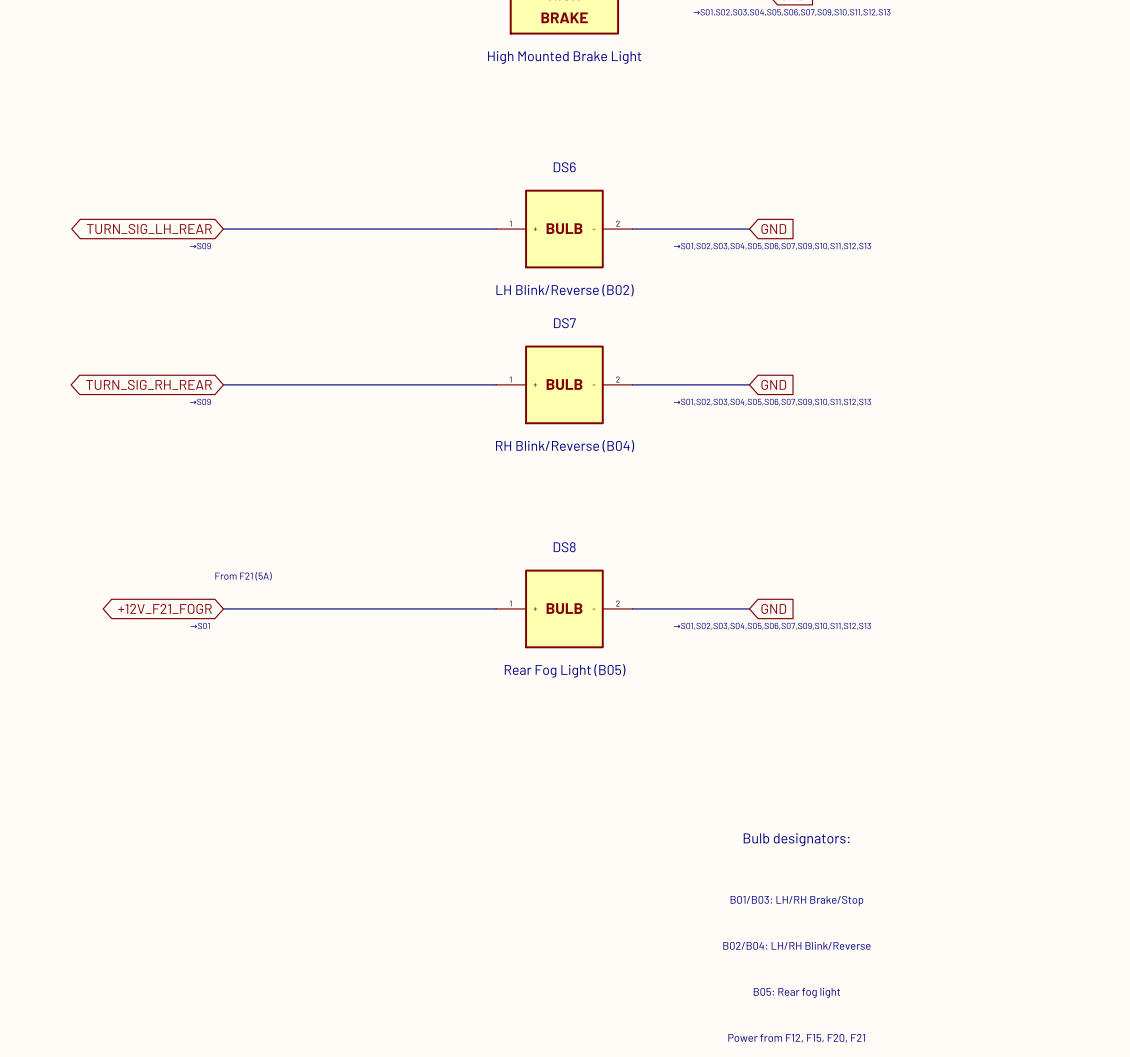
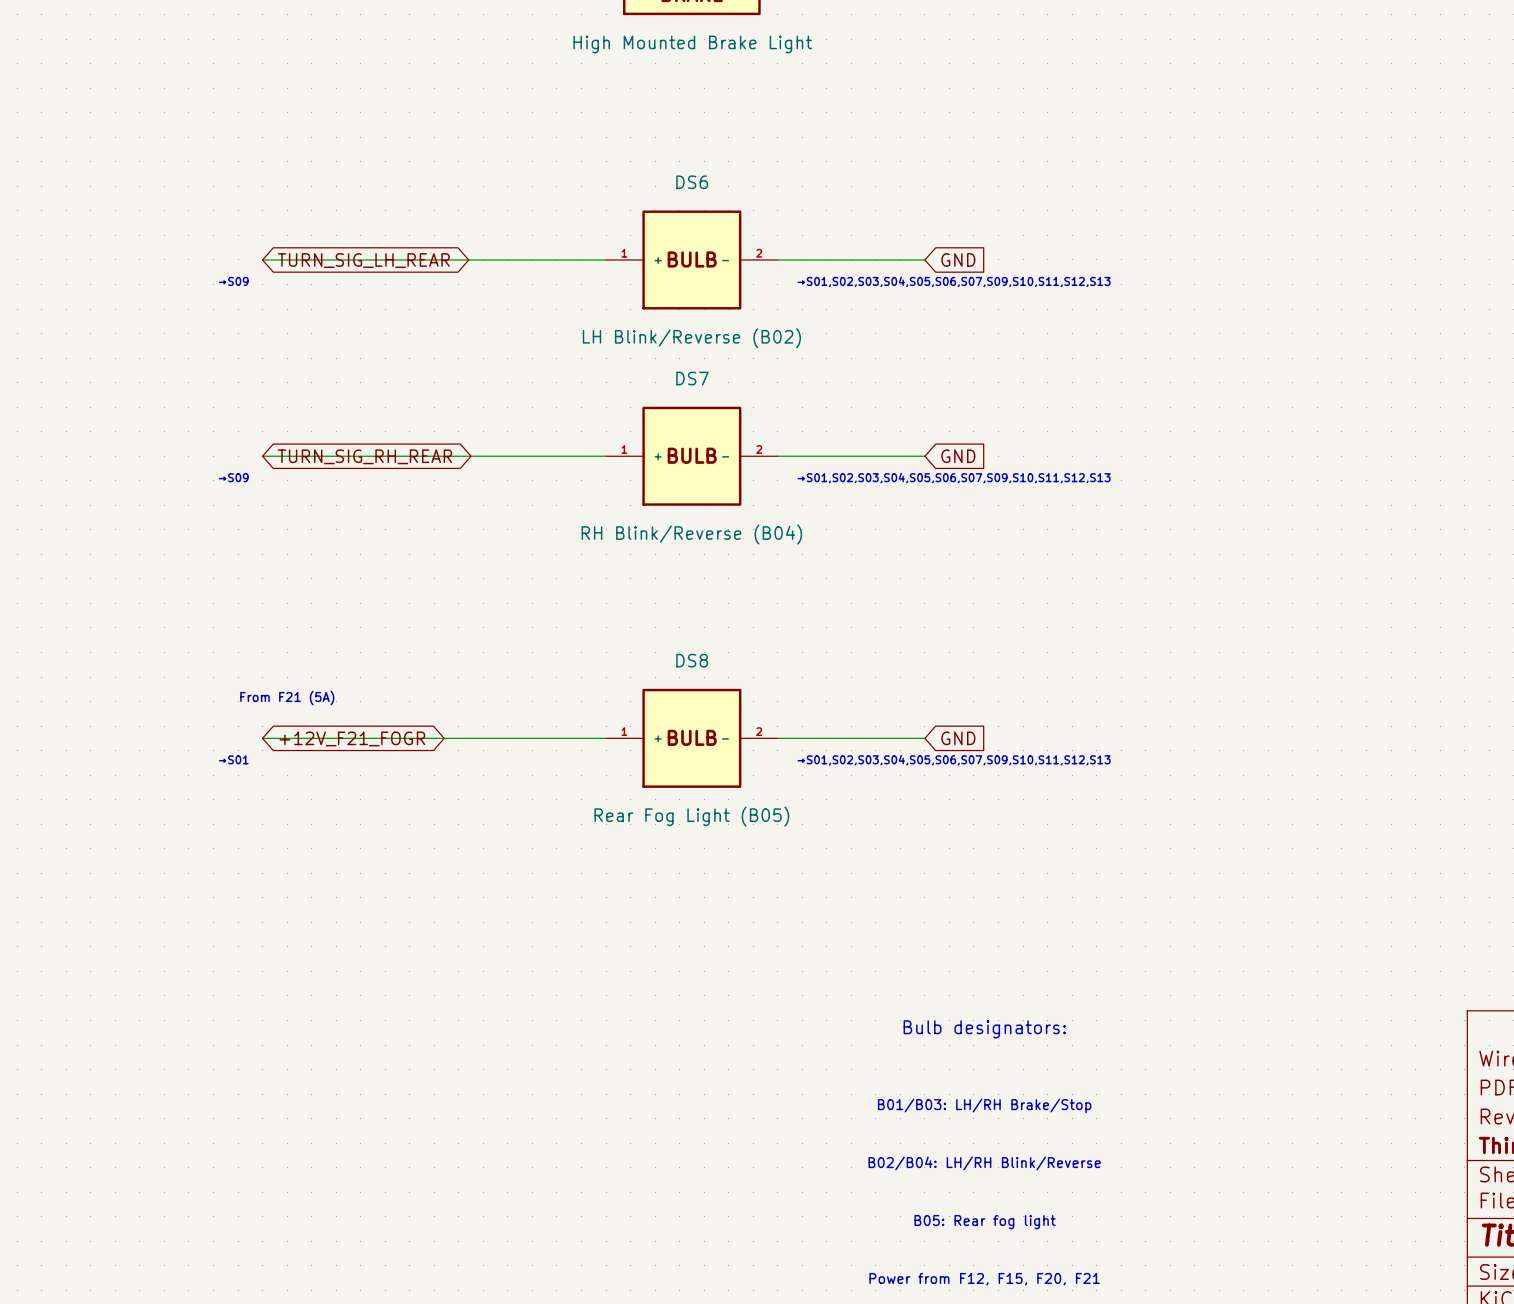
global label rotation: 0° (149, 229) -> 180° (363, 260)
global label rotation: 0° (149, 384) -> 180° (364, 456)
global label rotation: 0° (165, 608) -> 180° (352, 738)

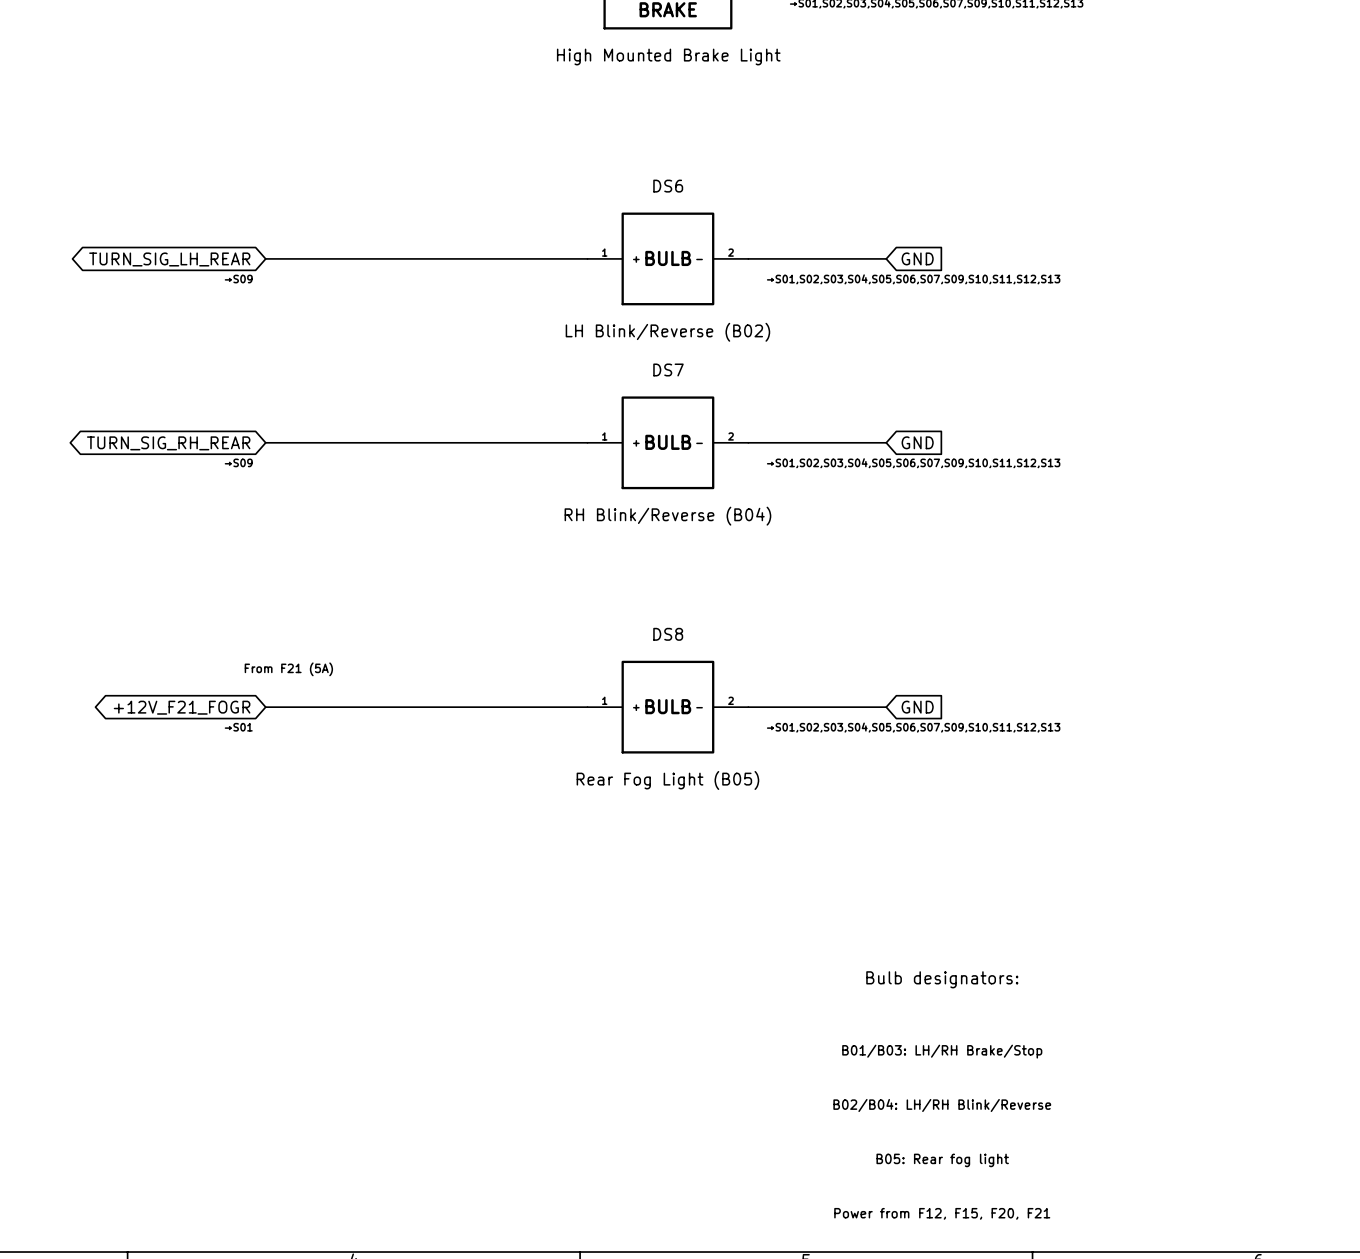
global label rotation: 0° (363, 260) -> 180° (169, 259)
global label rotation: 0° (364, 456) -> 180° (168, 443)
global label rotation: 0° (352, 738) -> 180° (182, 707)

